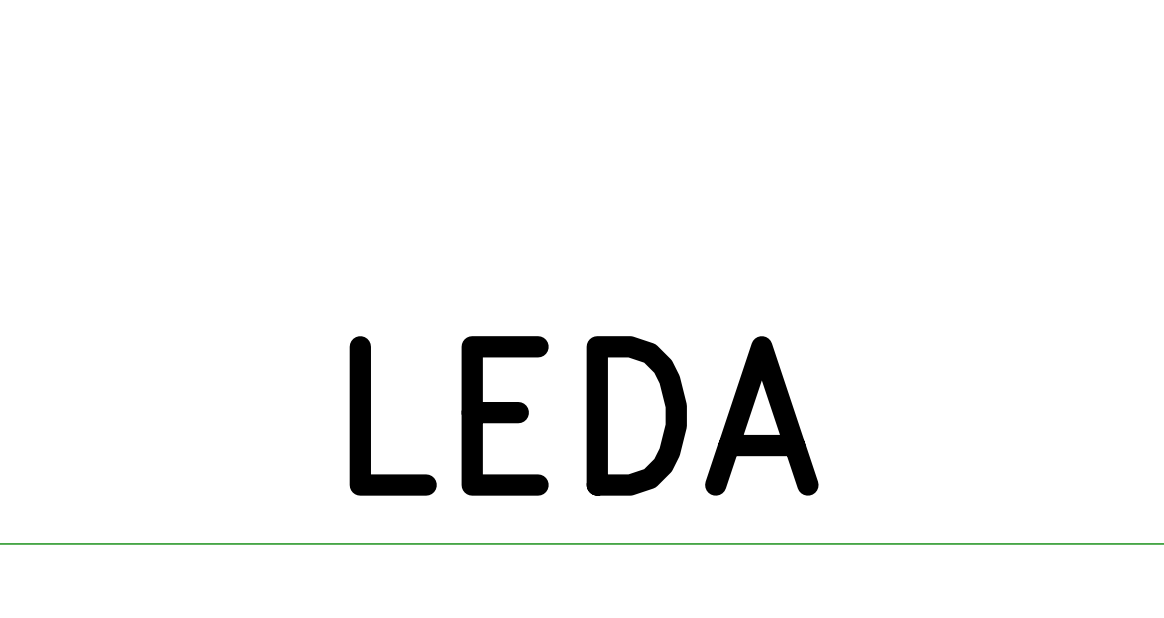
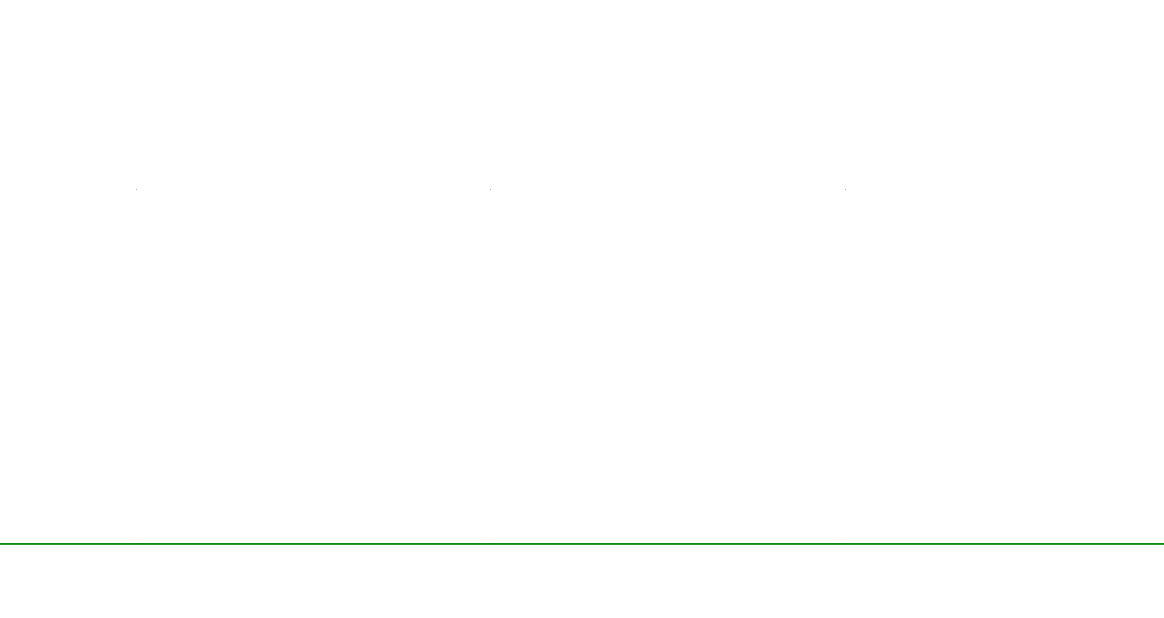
label: LEDA (584, 415) -> none

